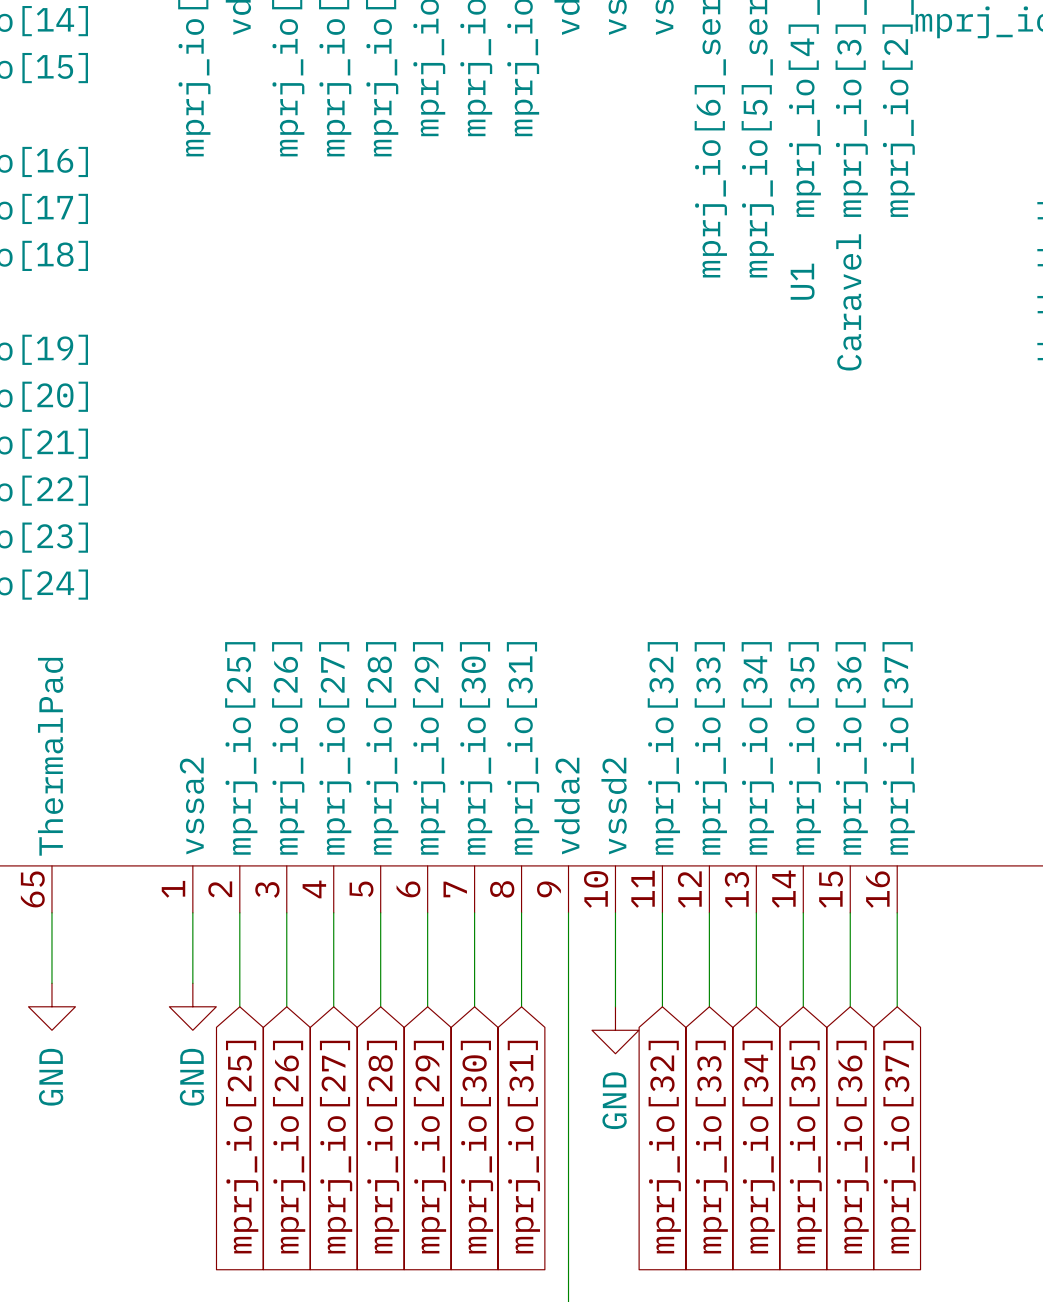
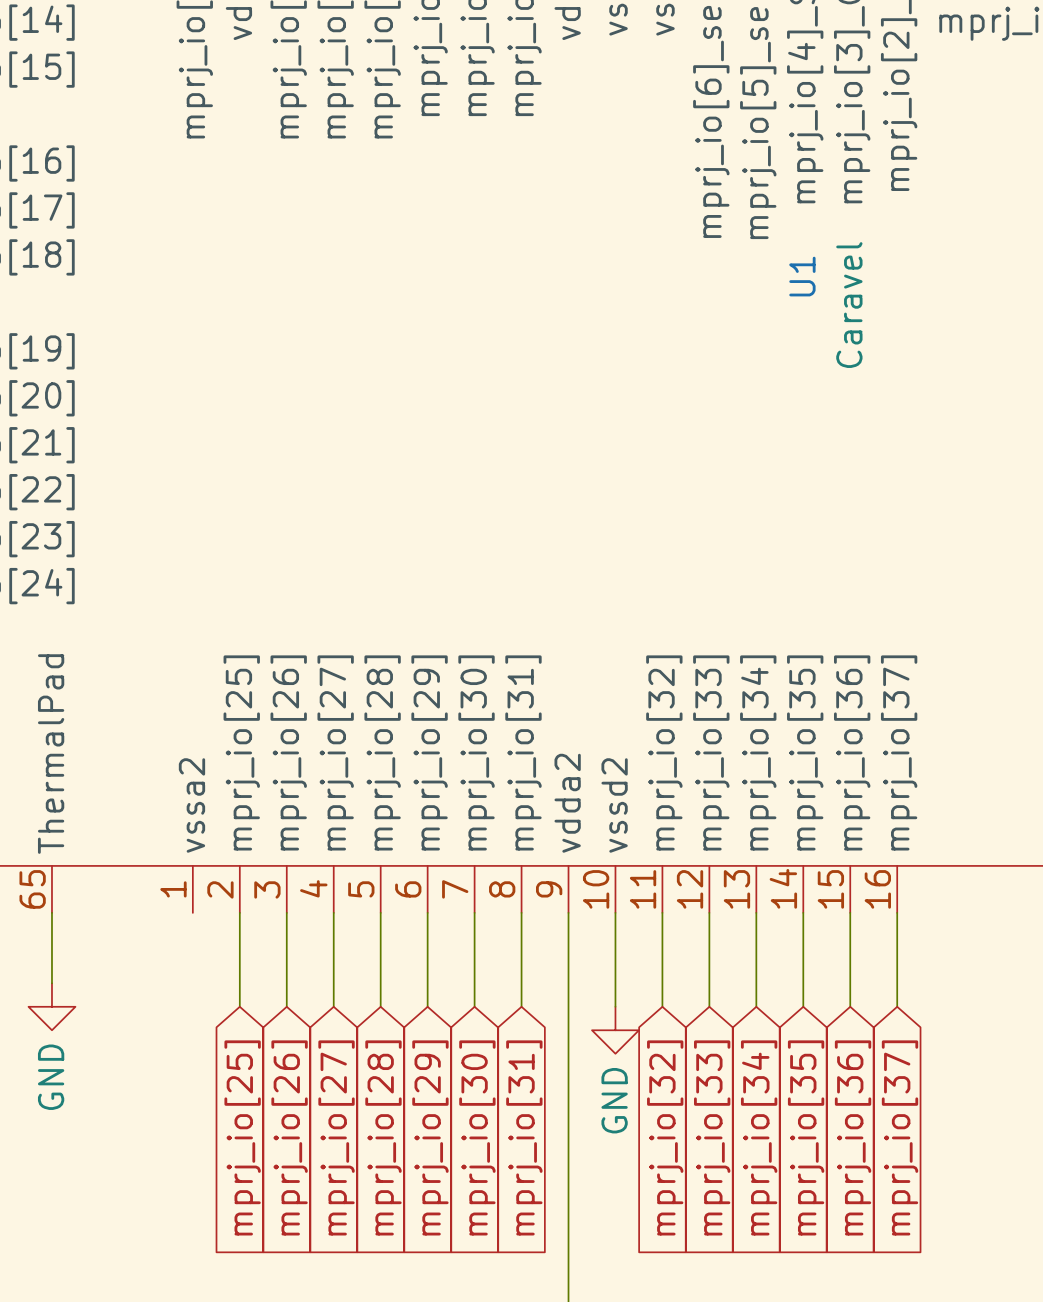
wire: (192, 912) (192, 983) -> none
power symbol: GND (192, 1006) -> none

